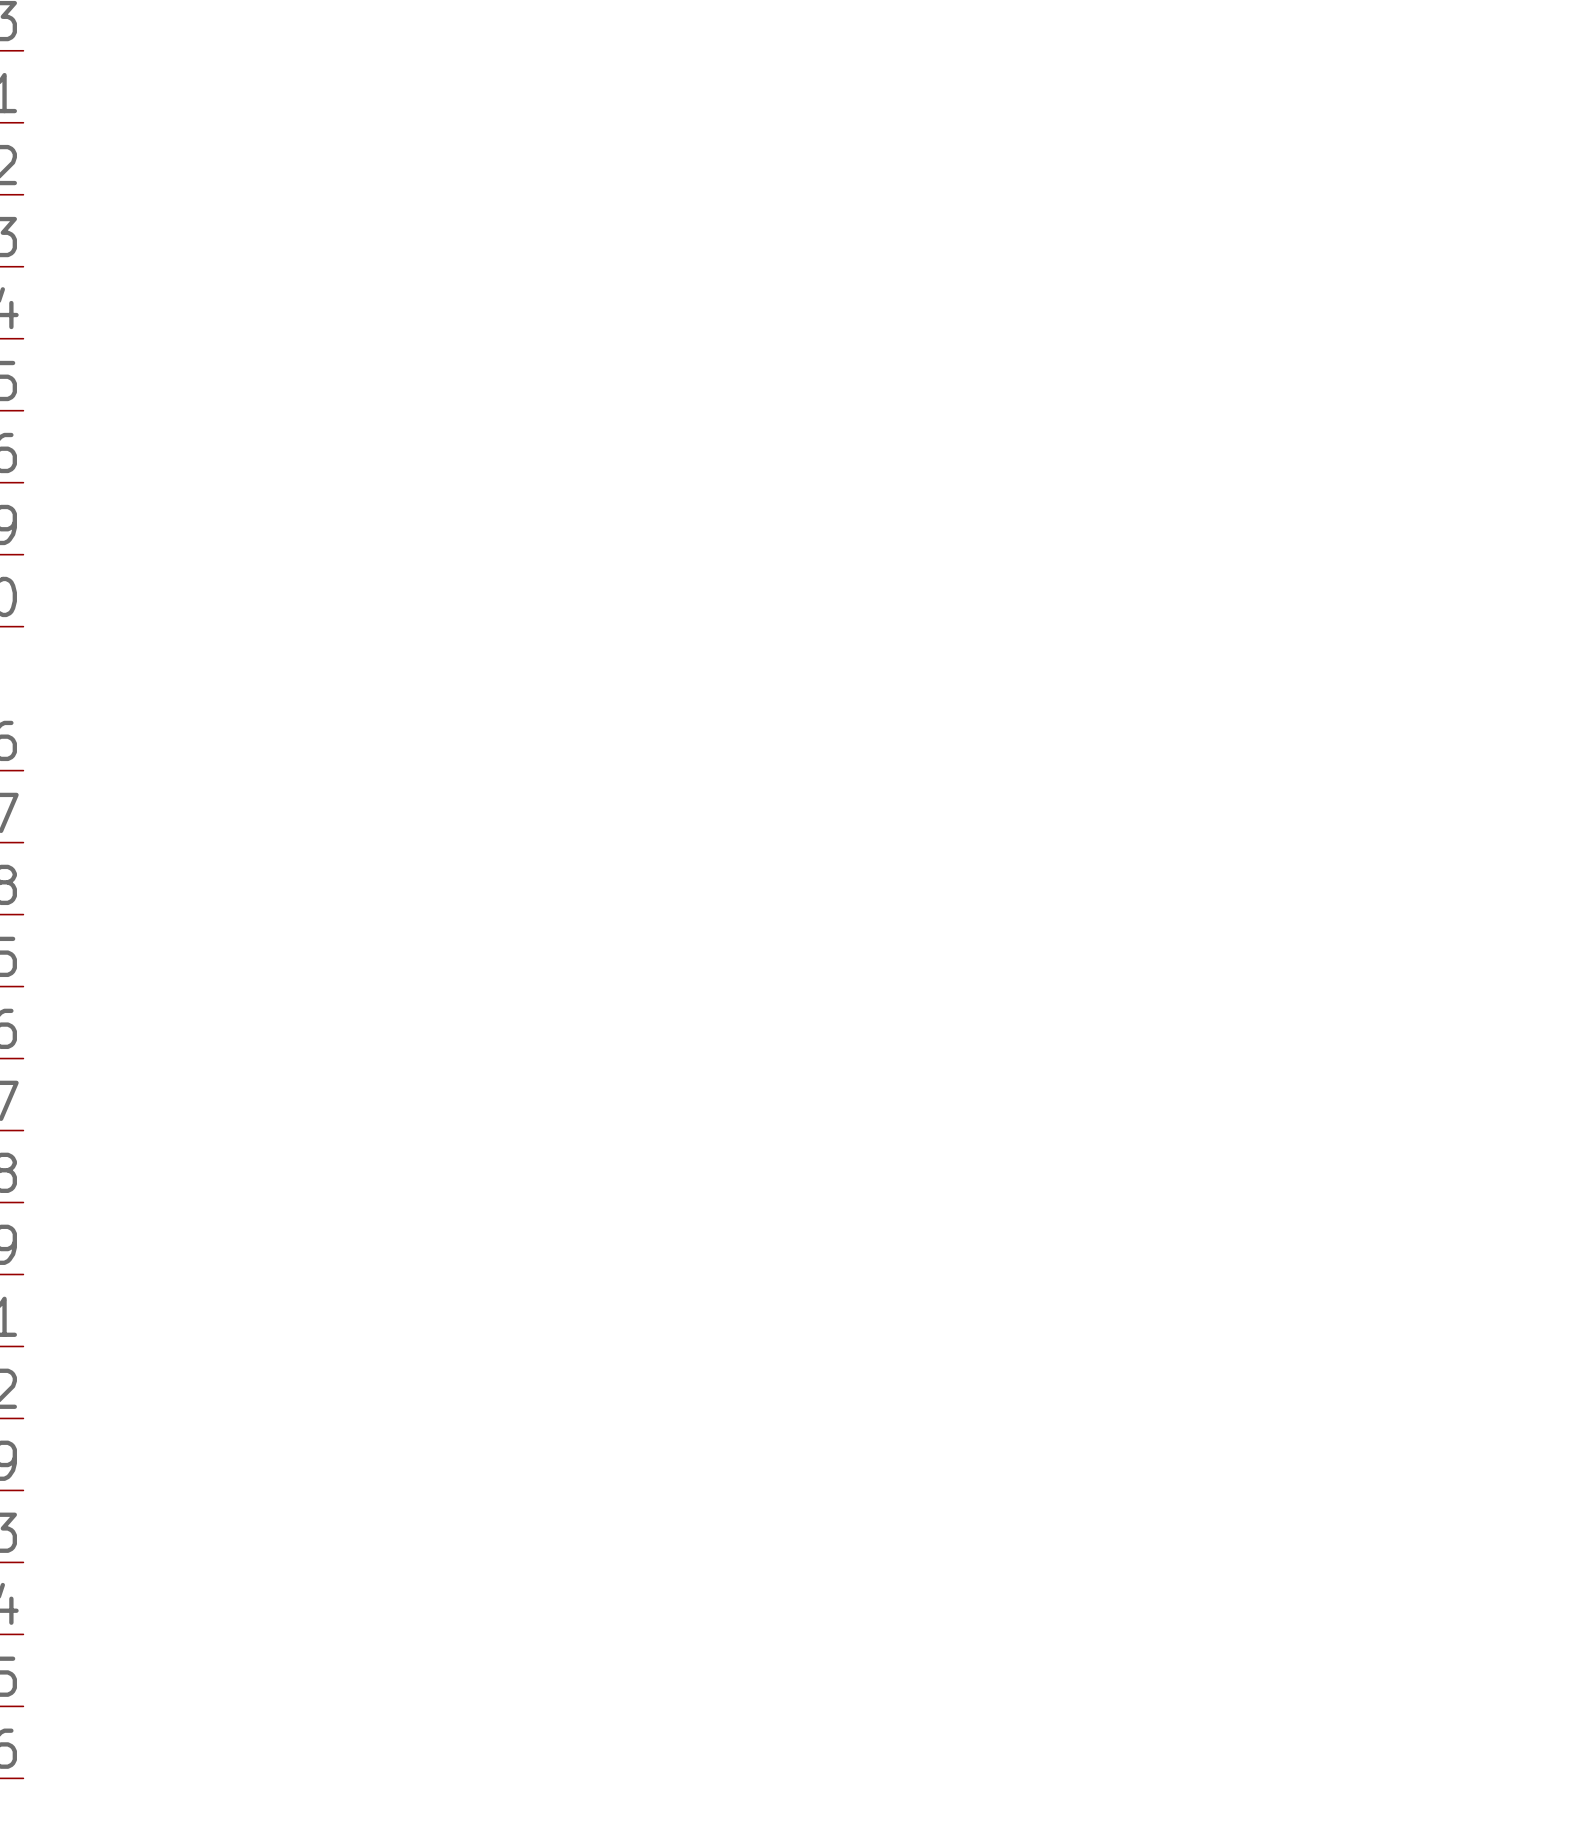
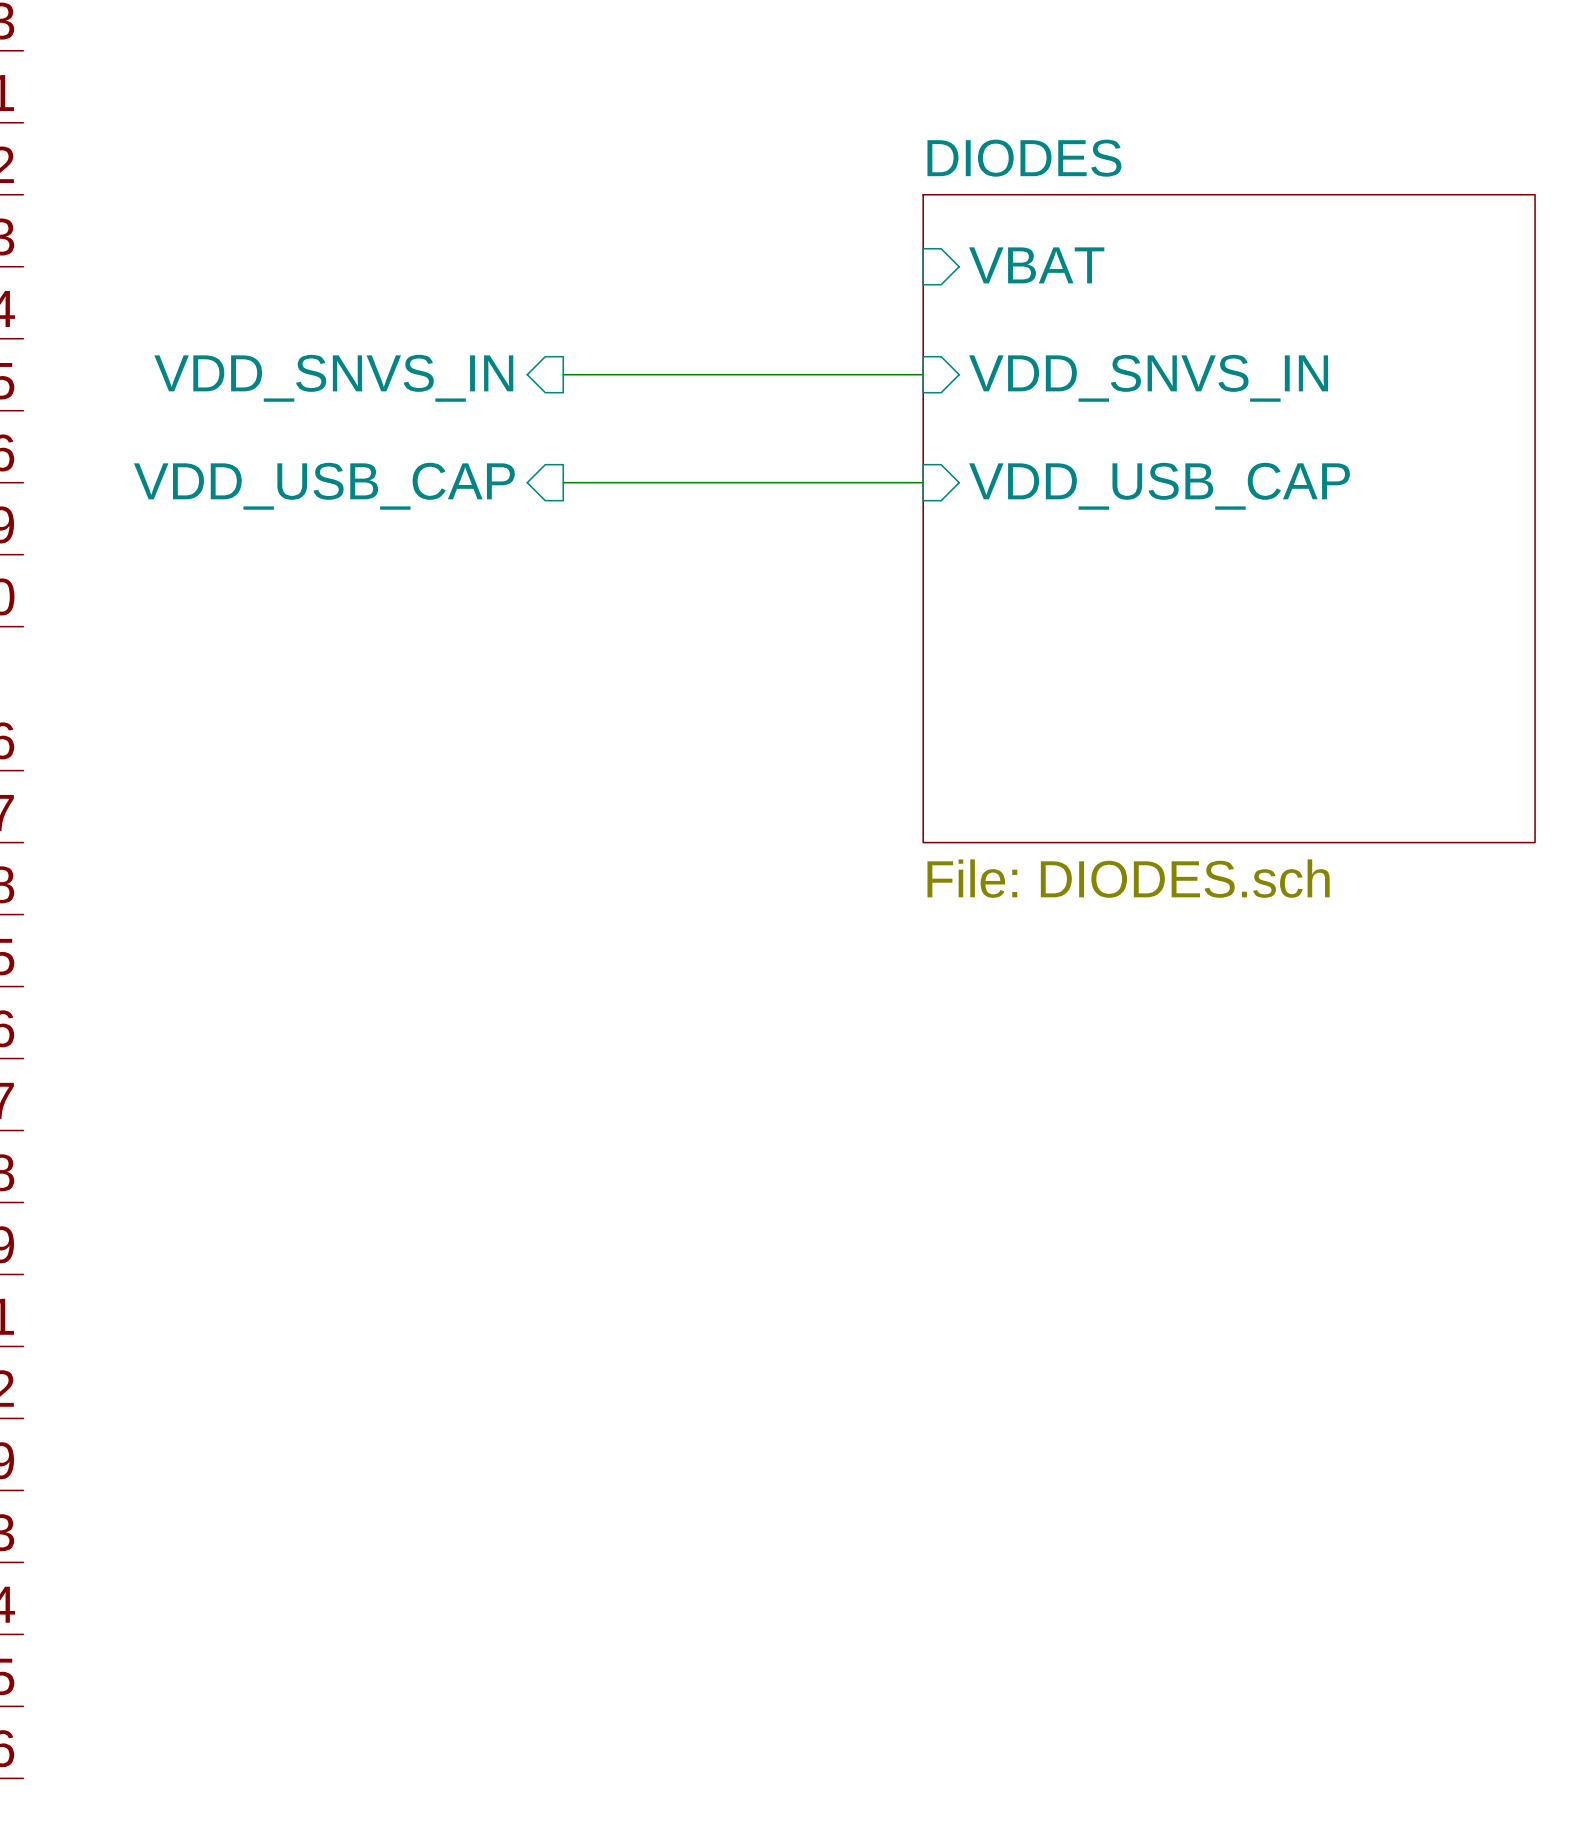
sheet pin: none -> VBAT (1036, 265)
wire: none -> (563, 374) (923, 374)
sheet pin: none -> VDD_SNVS_IN (333, 378)
sheet pin: none -> VDD_SNVS_IN (1148, 378)
wire: none -> (563, 482) (923, 482)
sheet pin: none -> VDD_USB_CAP (324, 486)
sheet pin: none -> VDD_USB_CAP (1159, 486)
sheet DIODES: none -> File: DIODES.sch (1229, 518)

